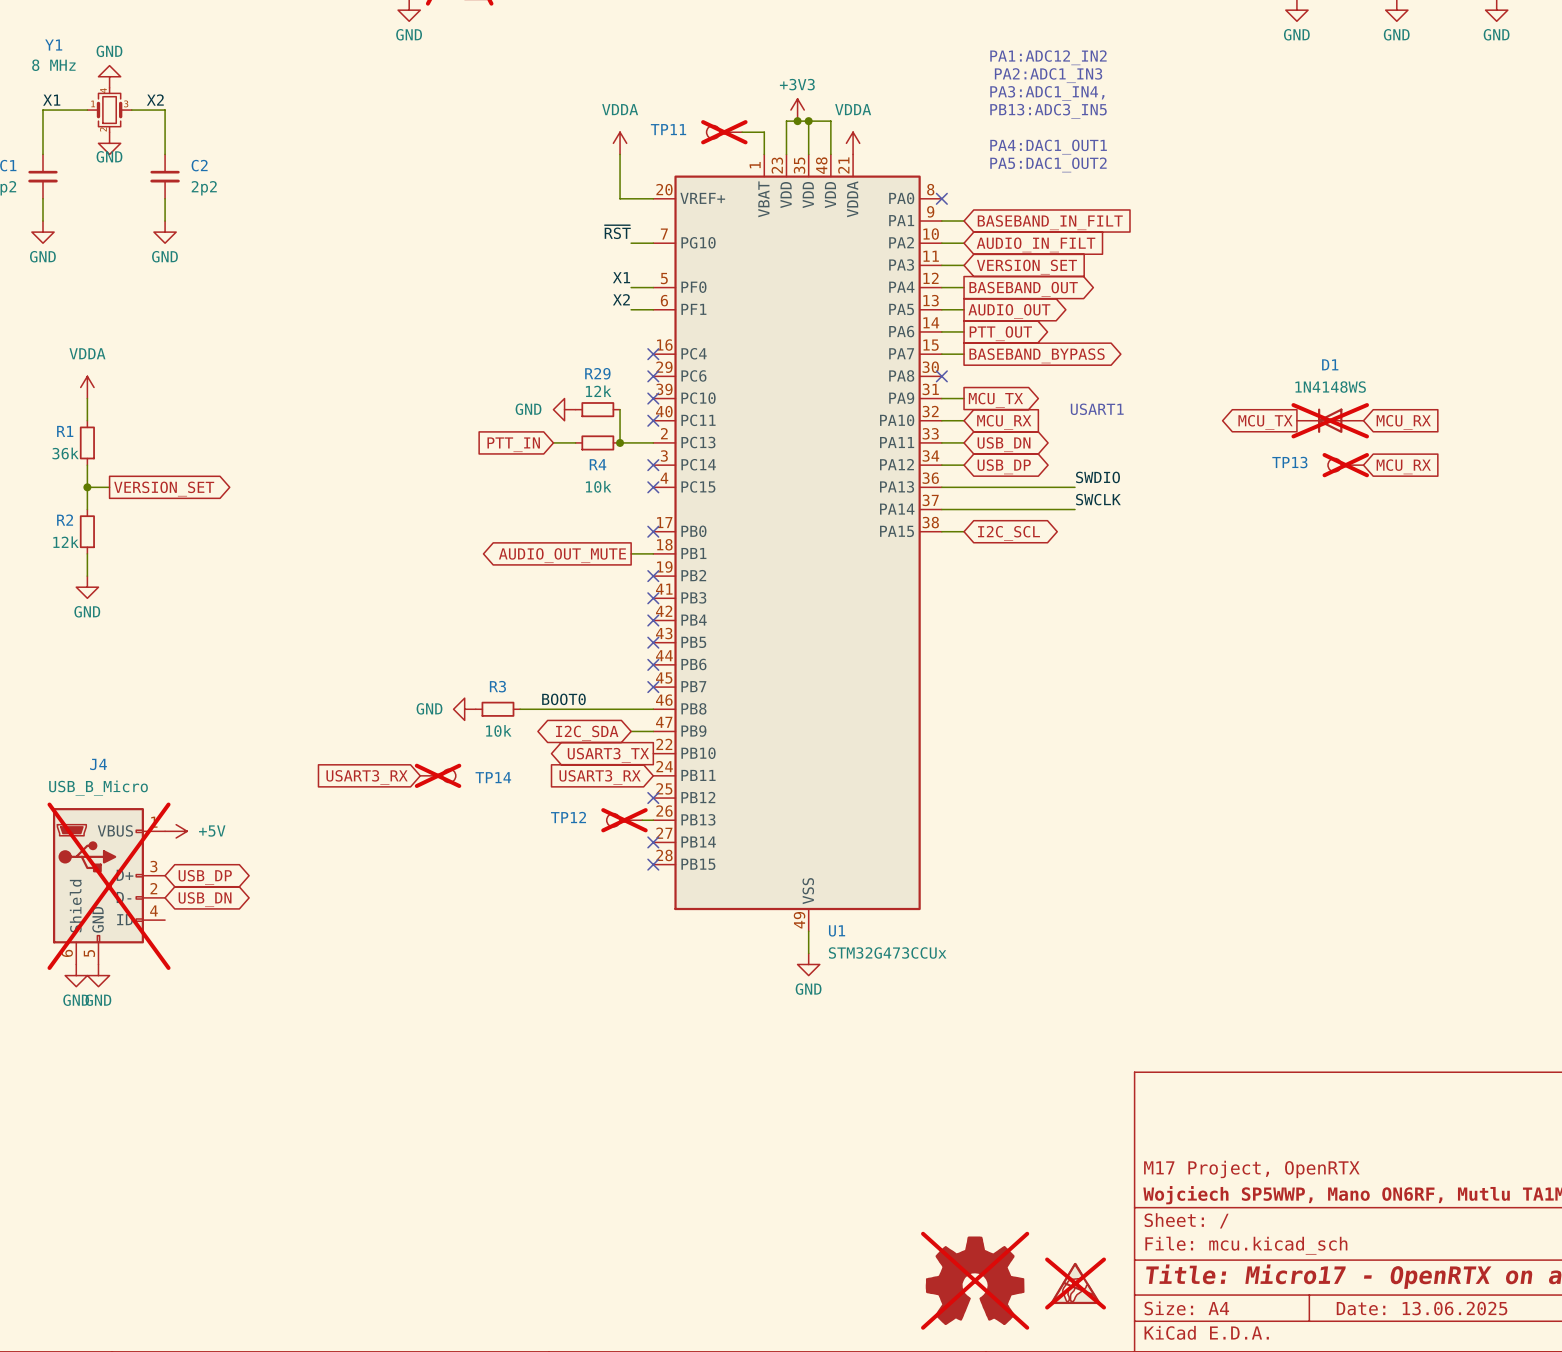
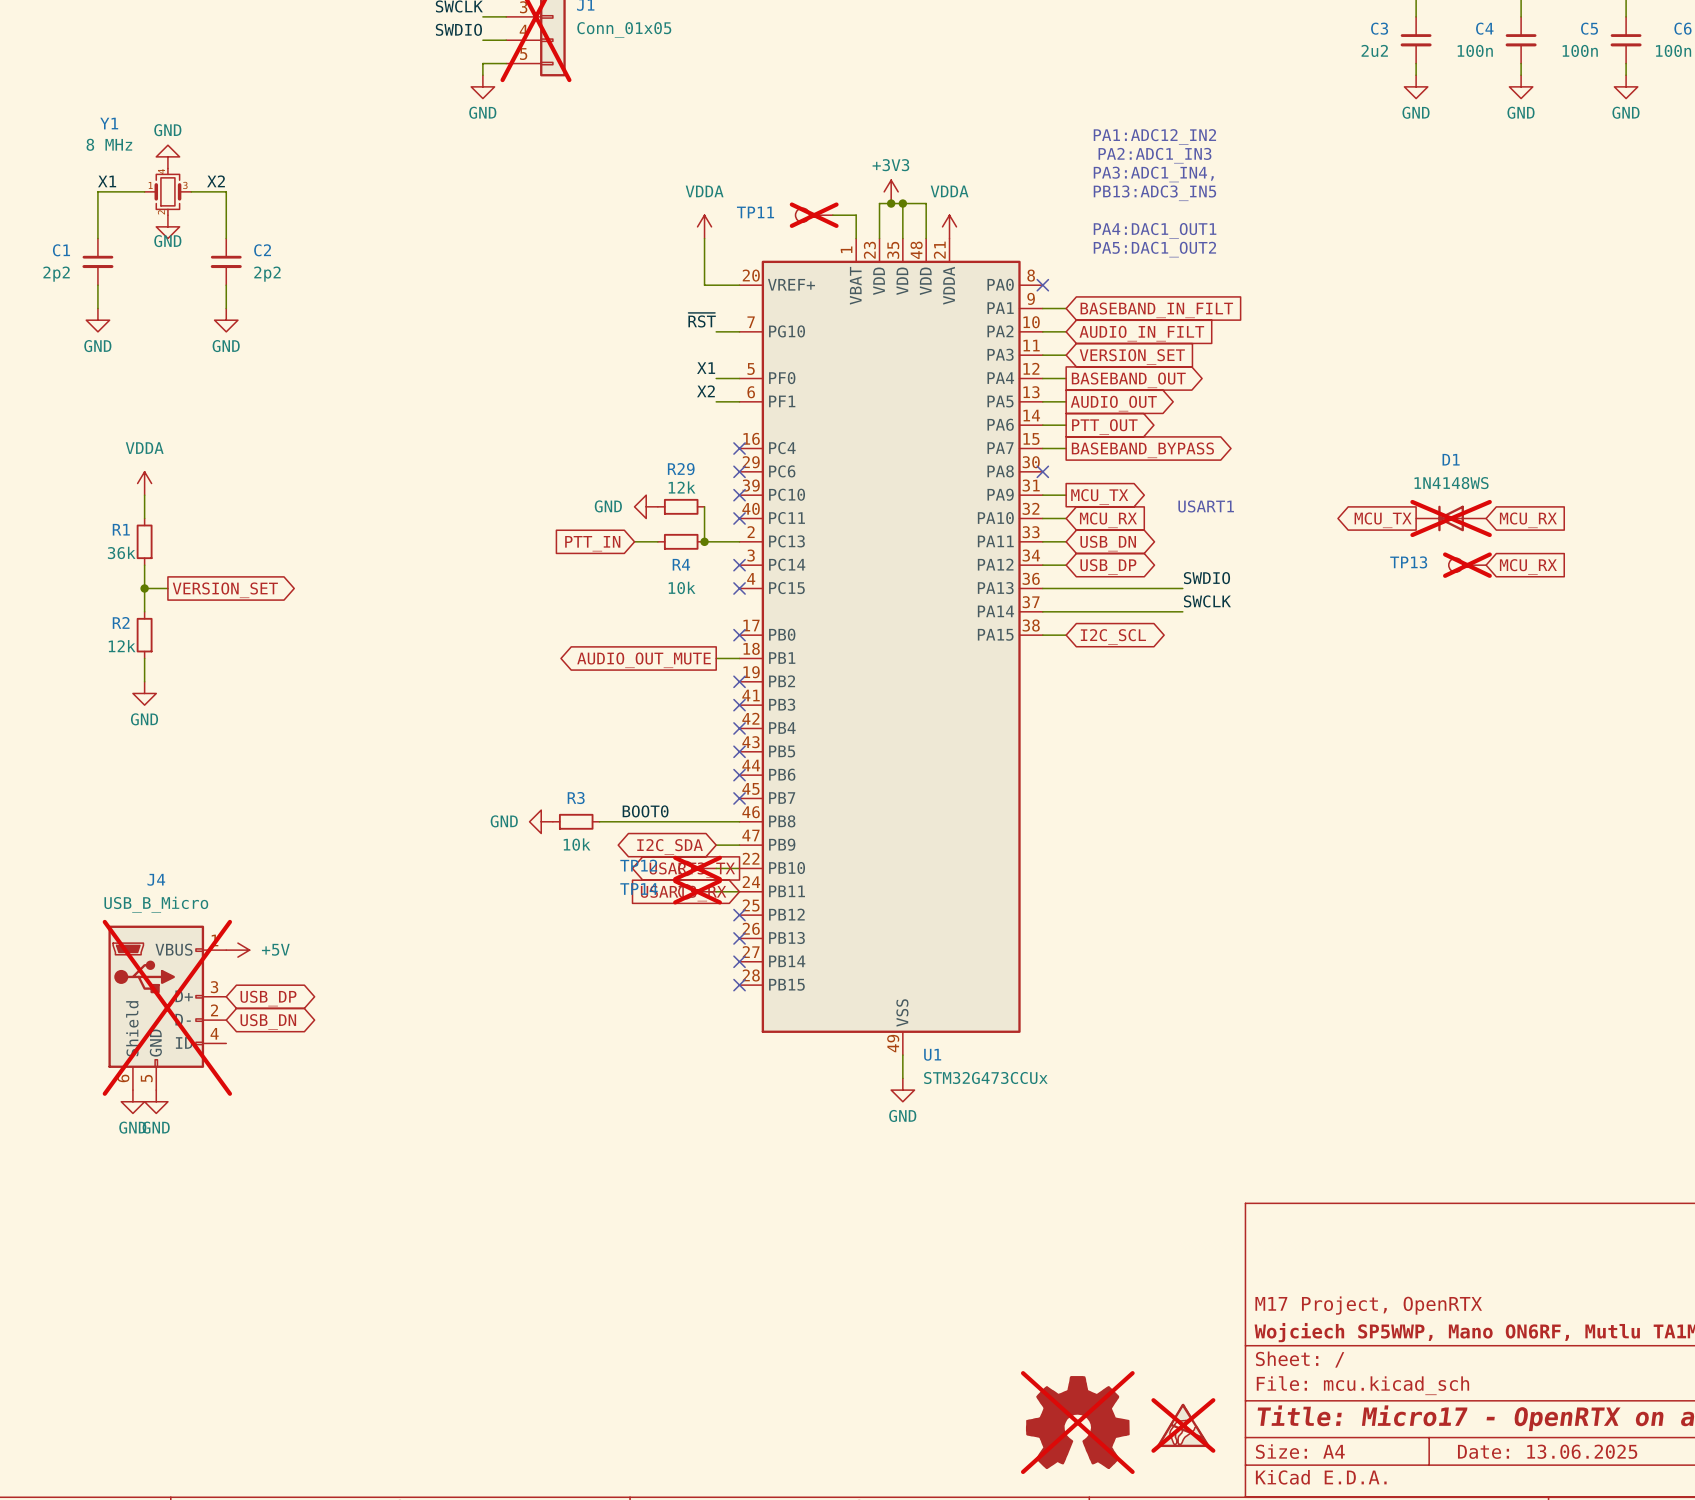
wire: none -> (716, 868) (739, 868)
TP14 position: (438, 775) -> (697, 891)
TP14 rotation: 0° (449, 775) -> 180° (685, 891)
wire: none -> (716, 891) (739, 891)
global label: USART3_RX (367, 777) -> none
TP12 position: (624, 820) -> (697, 868)
wire: (642, 820) (653, 820) -> none
no-connect mark: none -> (739, 938)

